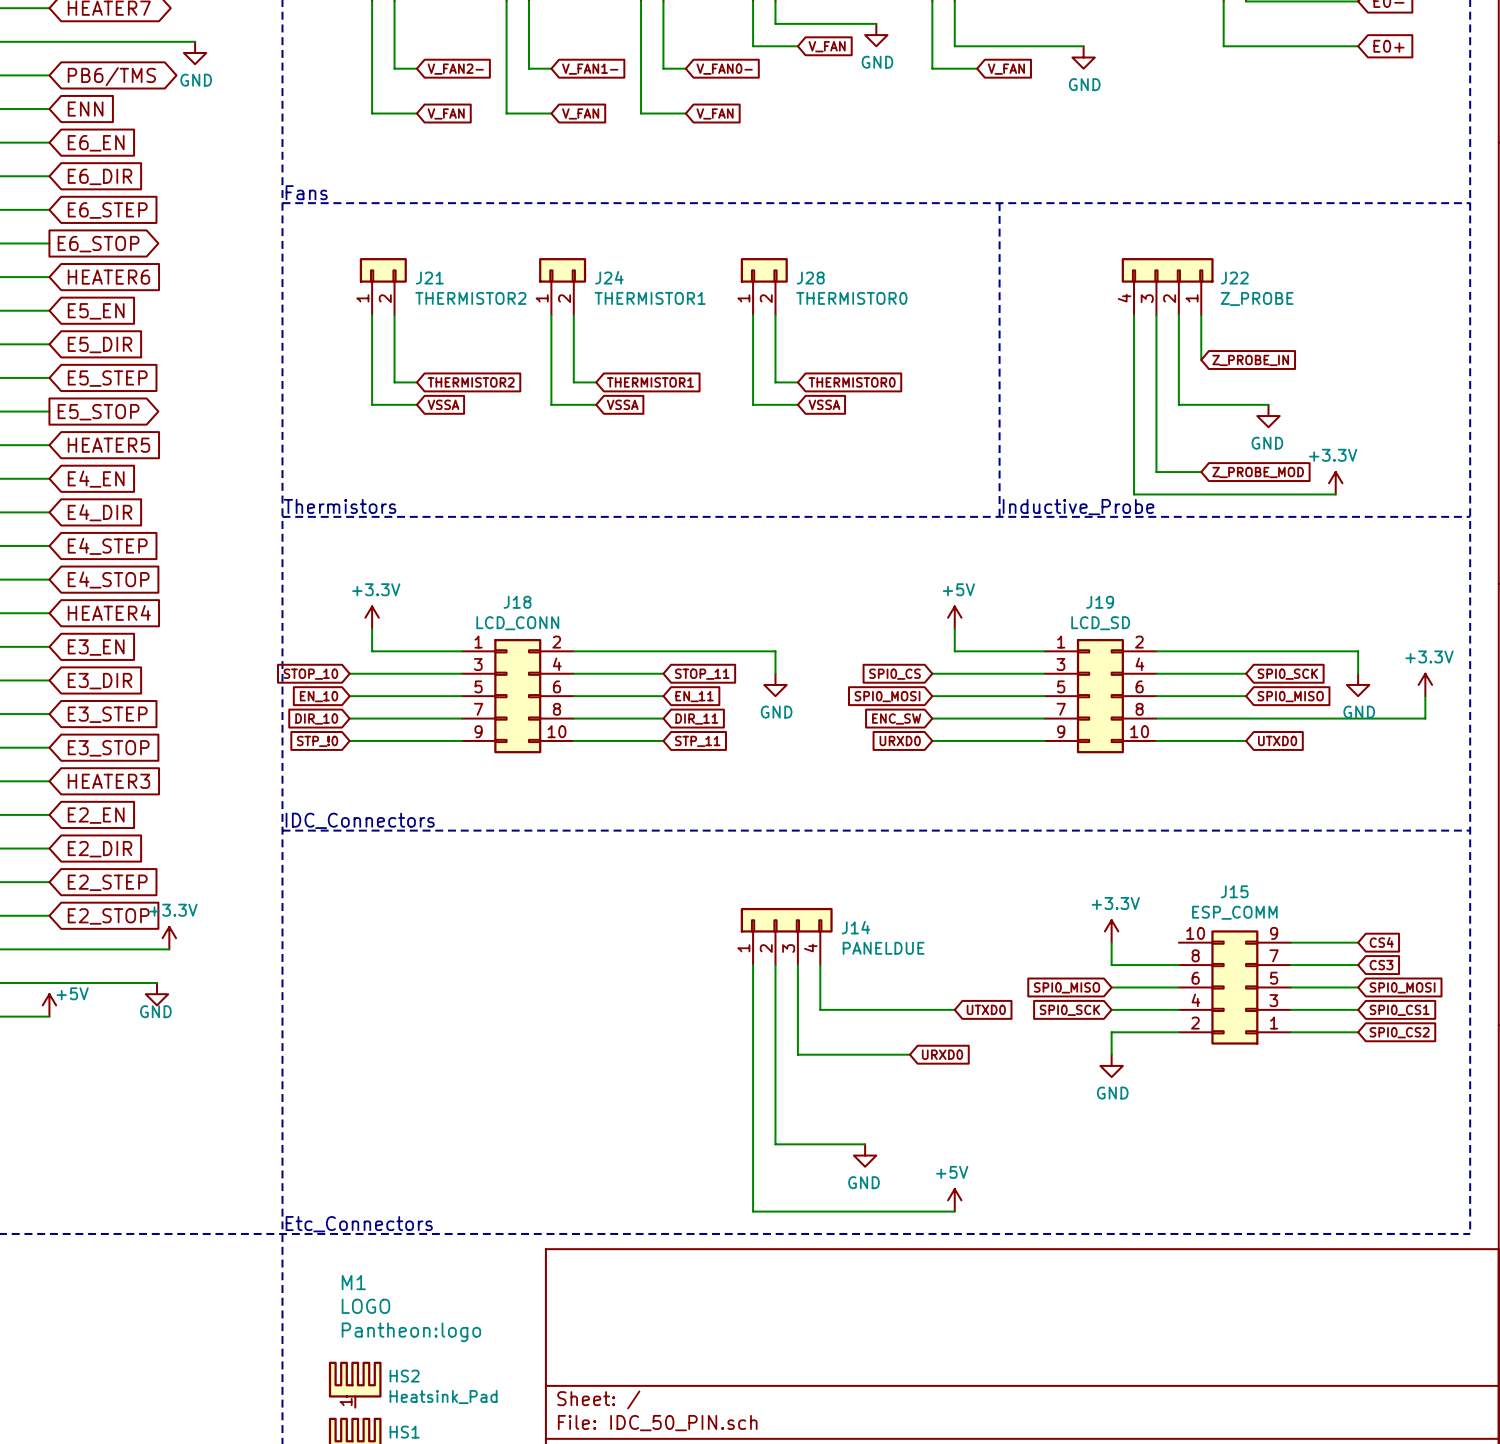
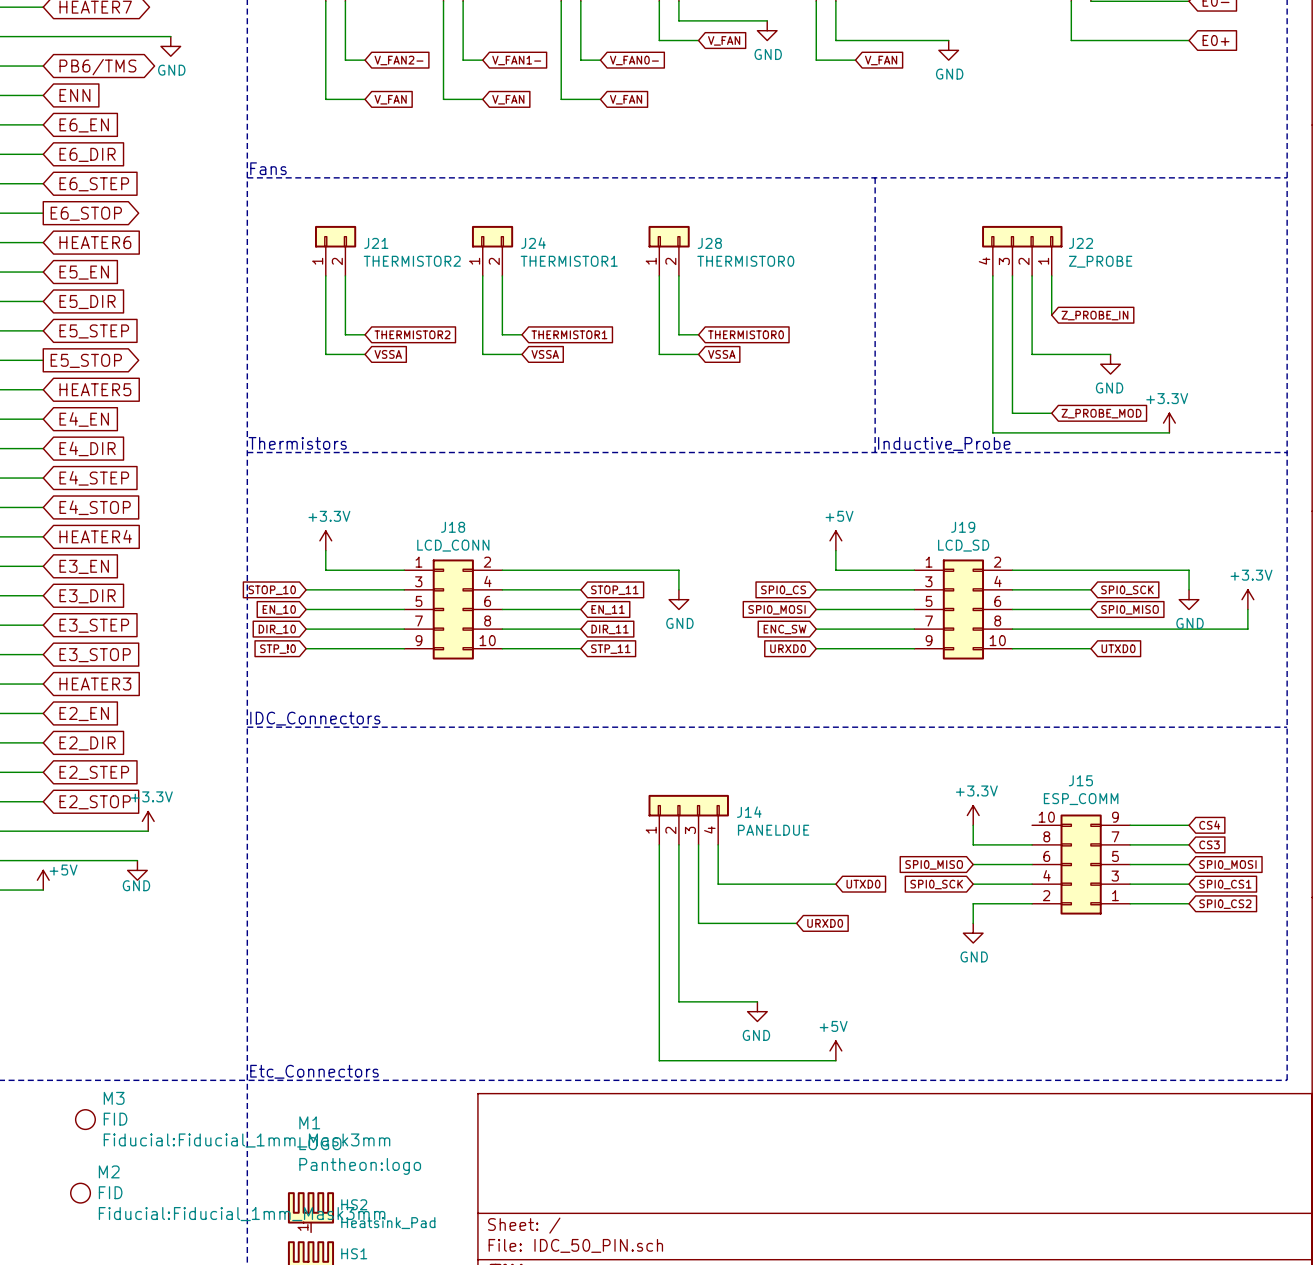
M3: none -> FID (85, 1119)
M2: none -> FID (80, 1193)

